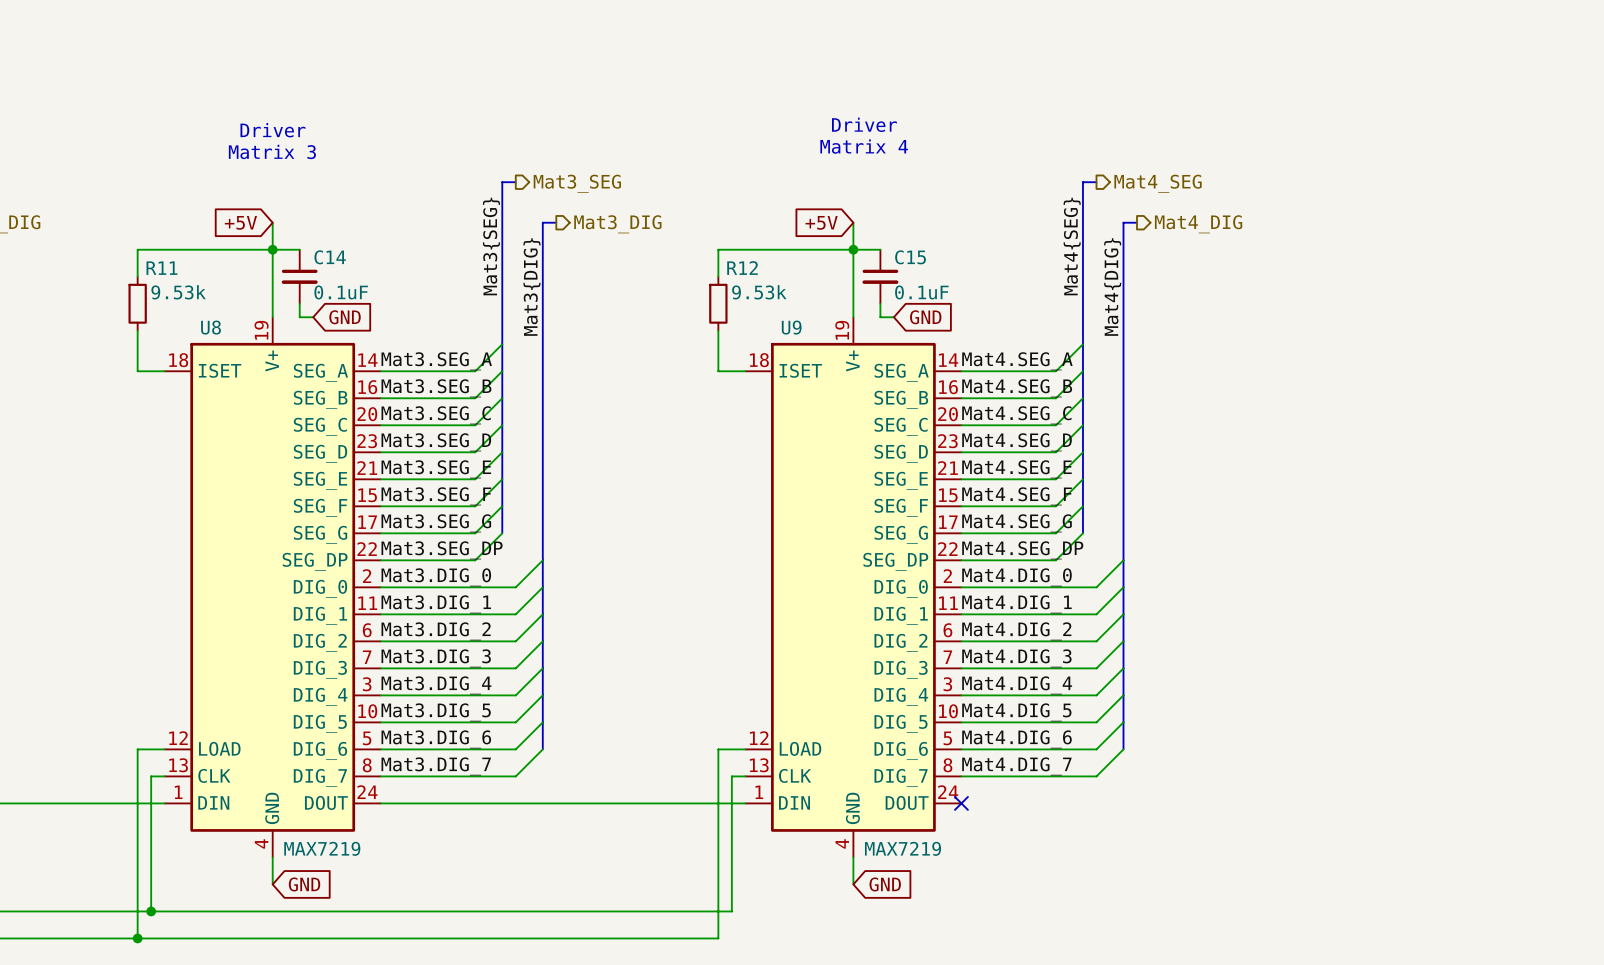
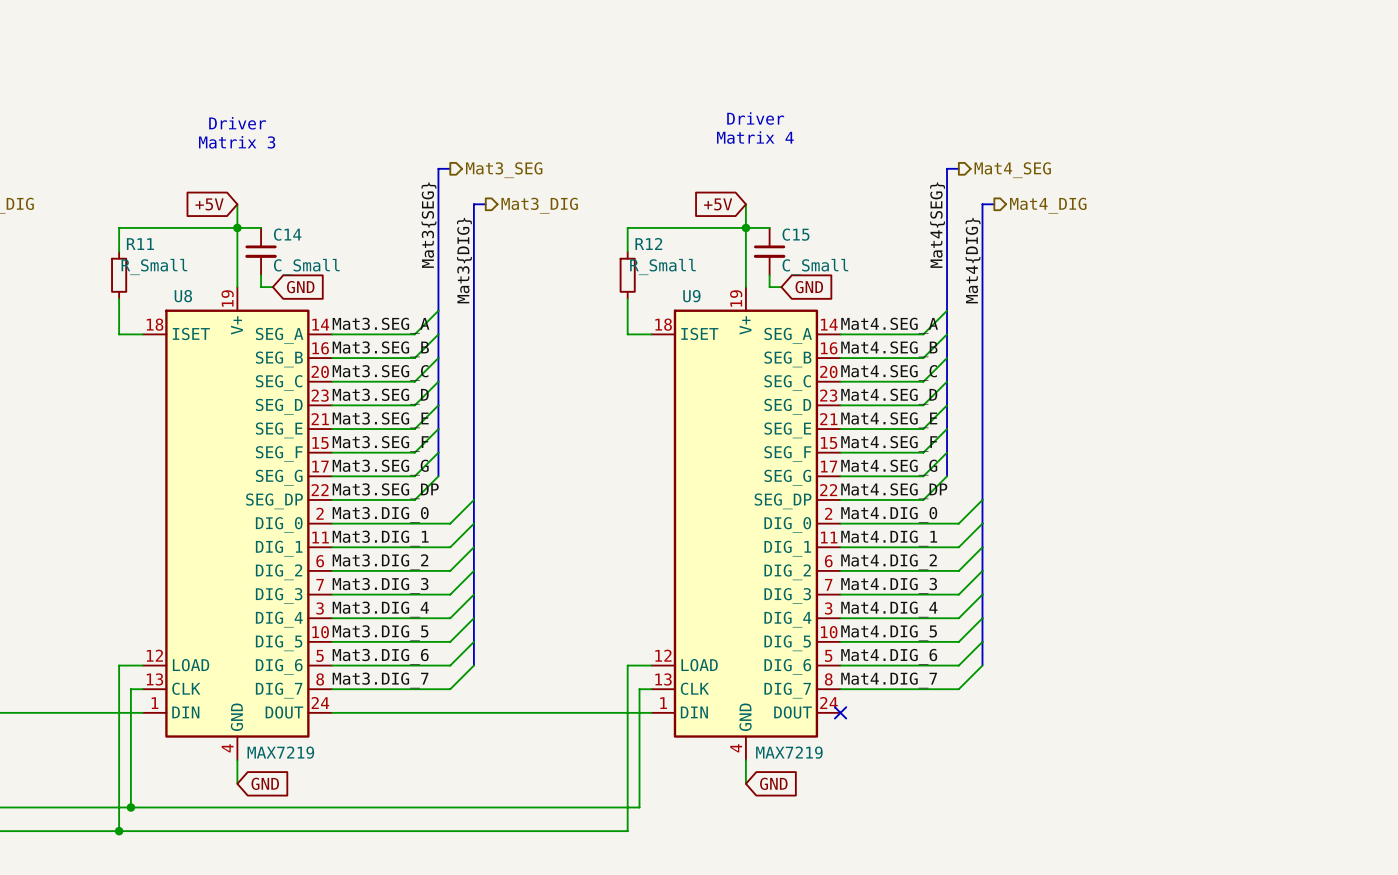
R11 value: 9.53k (178, 292) -> R_Small (154, 266)
C14 value: 0.1uF (341, 292) -> C_Small (306, 266)
R12 value: 9.53k (759, 292) -> R_Small (662, 266)
C15 value: 0.1uF (921, 292) -> C_Small (815, 266)

